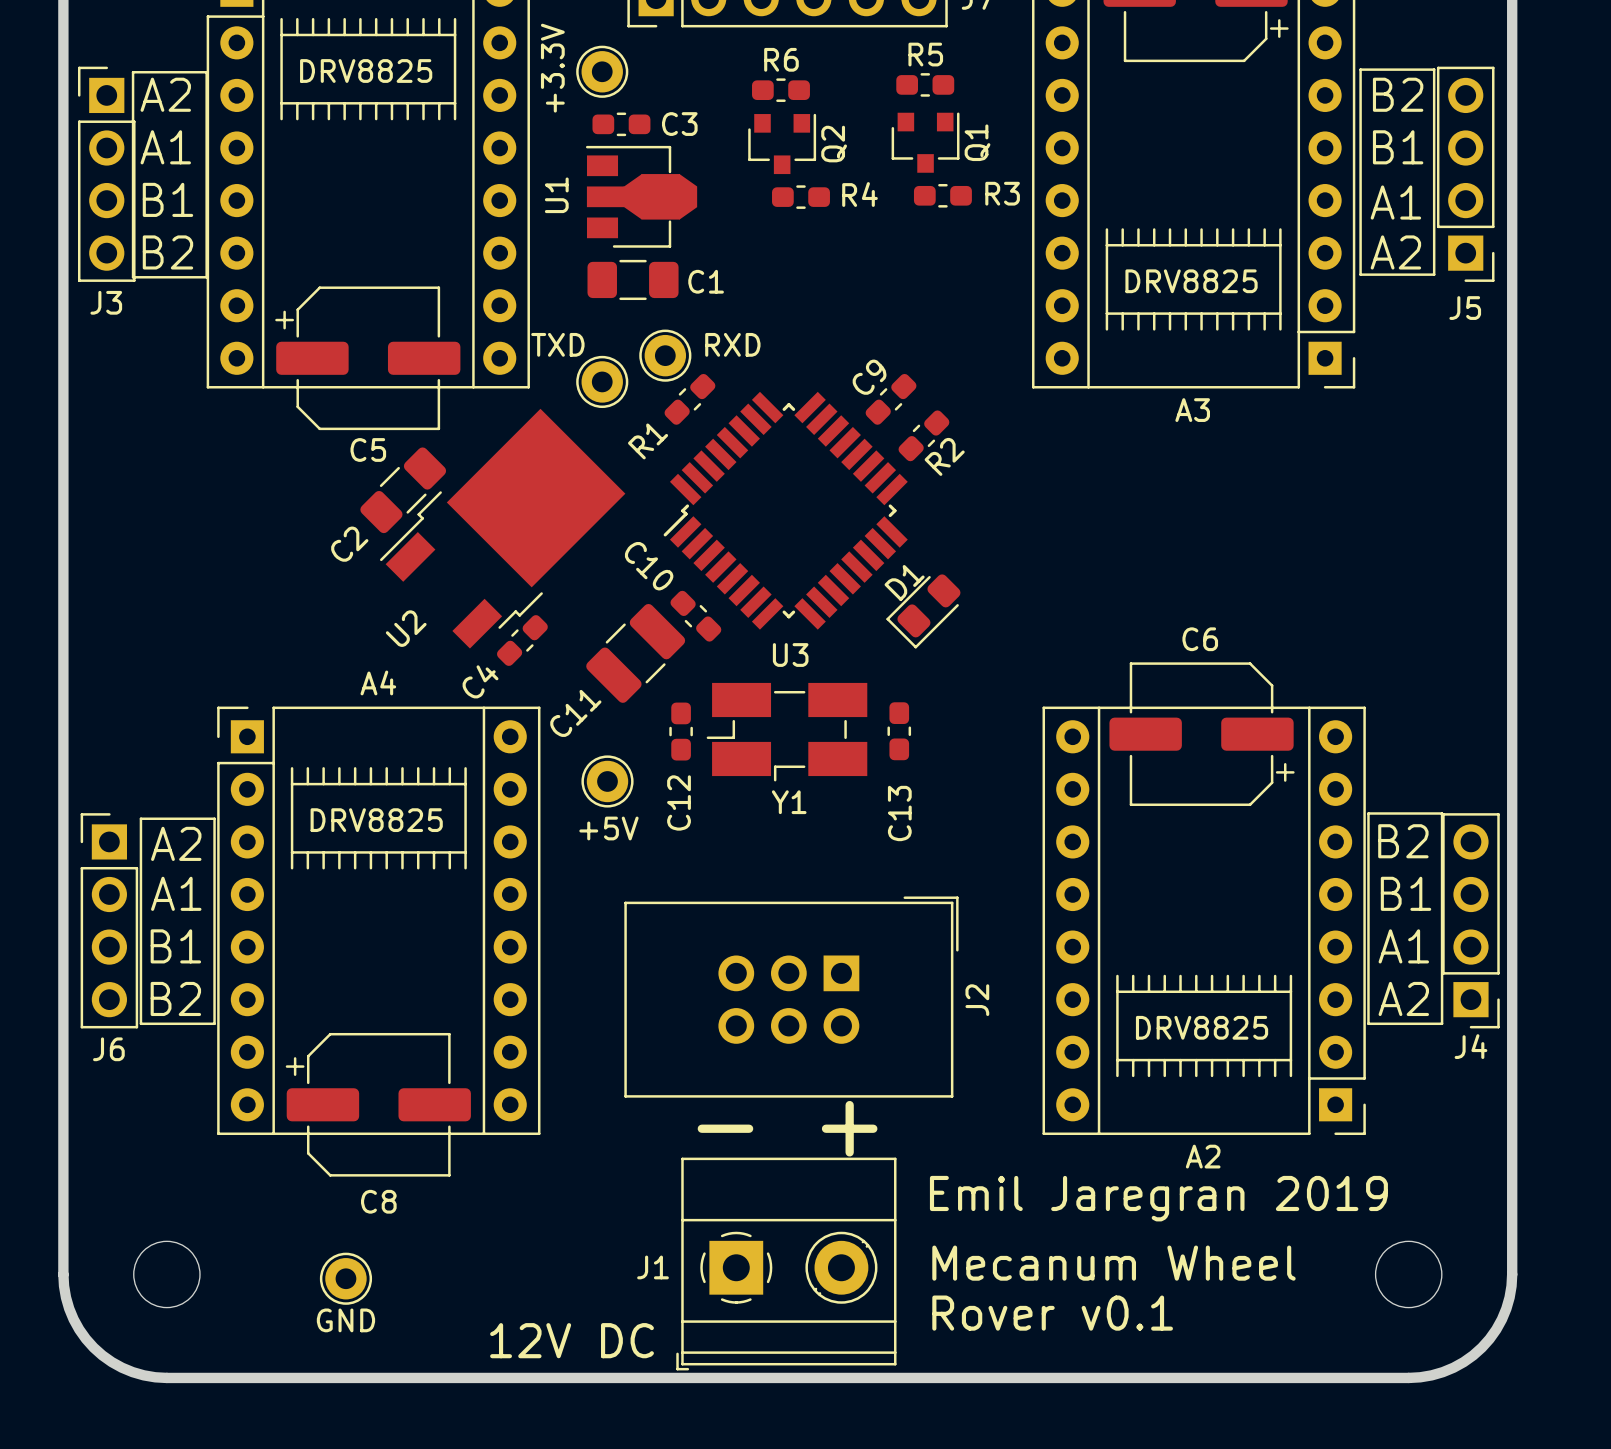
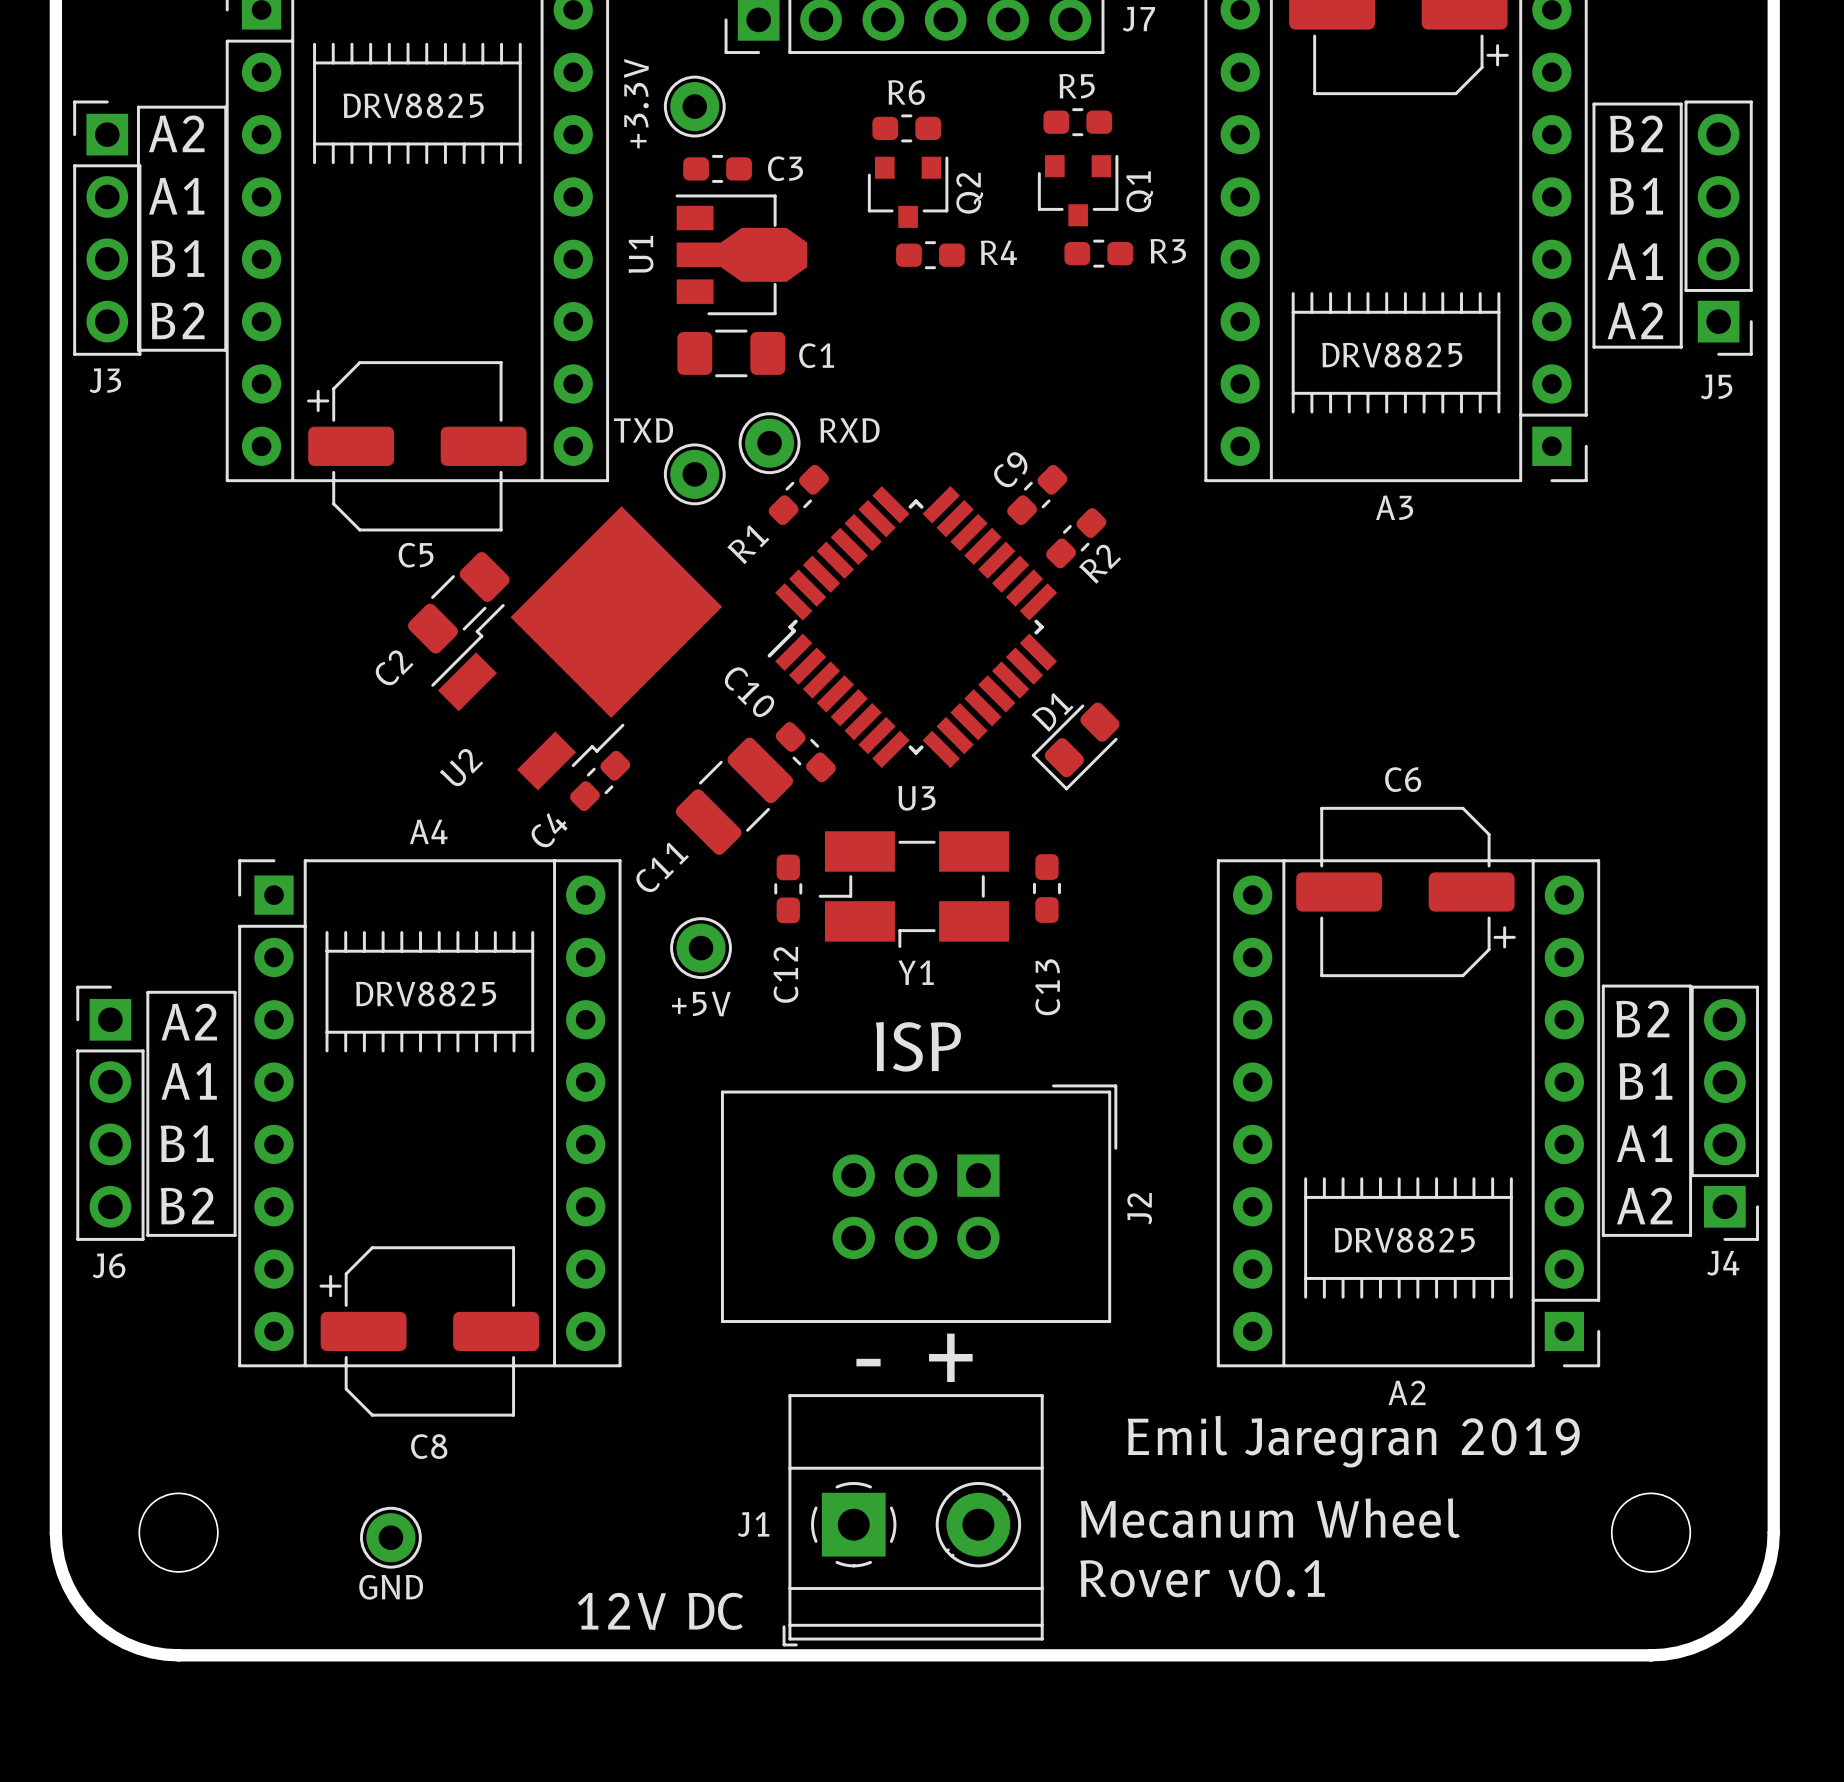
text: none -> ISP (918, 1046)

